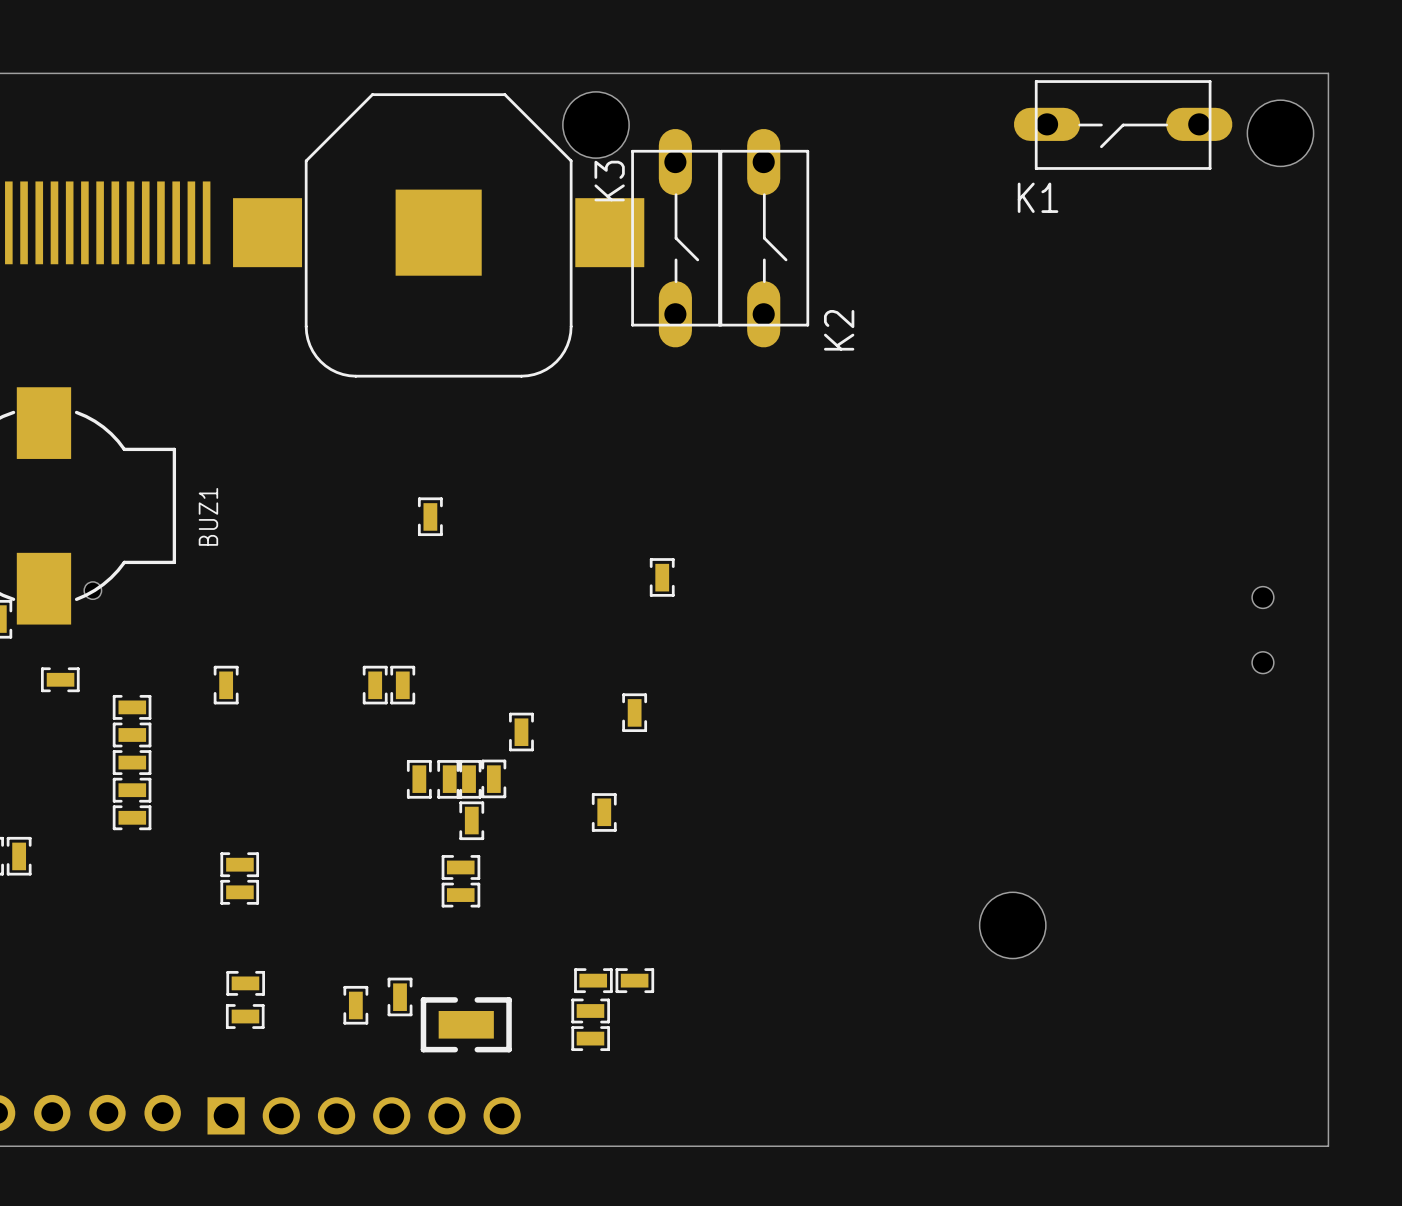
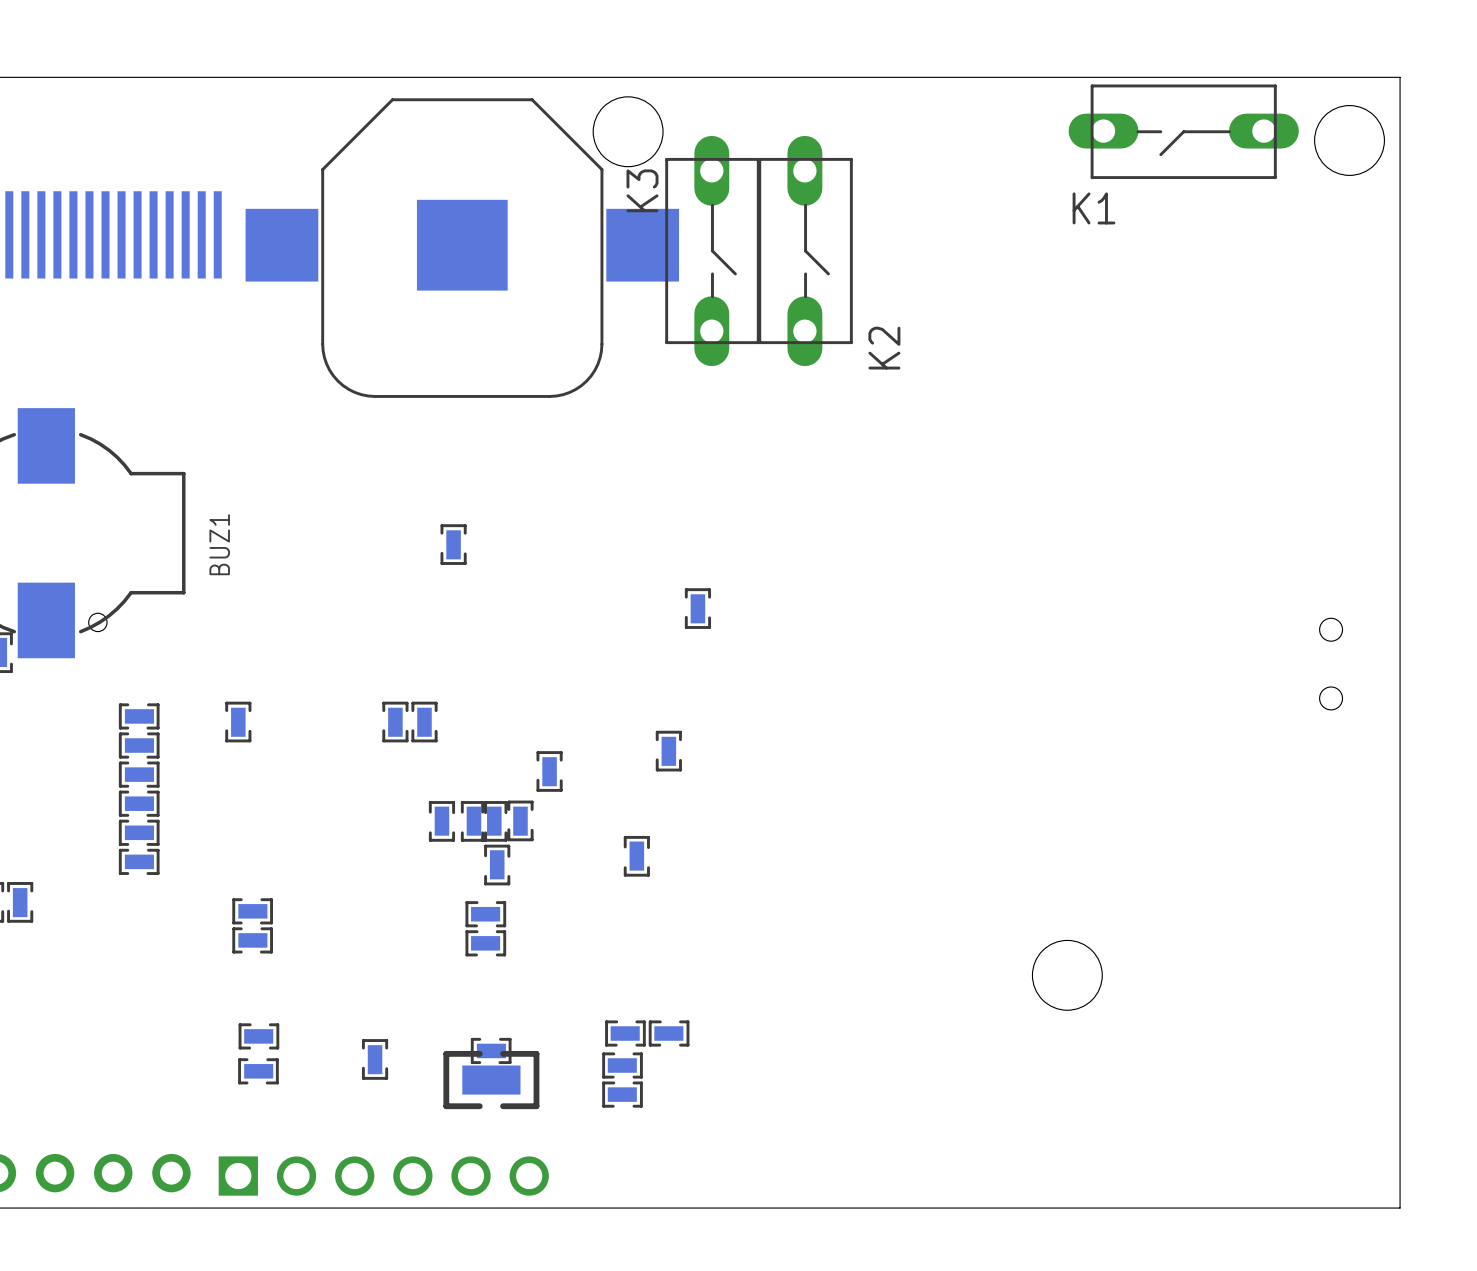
part position: (60, 679) -> (139, 716)
part rotation: 0° (400, 996) -> 90° counterclockwise (491, 1050)
part position: (400, 996) -> (491, 1050)

